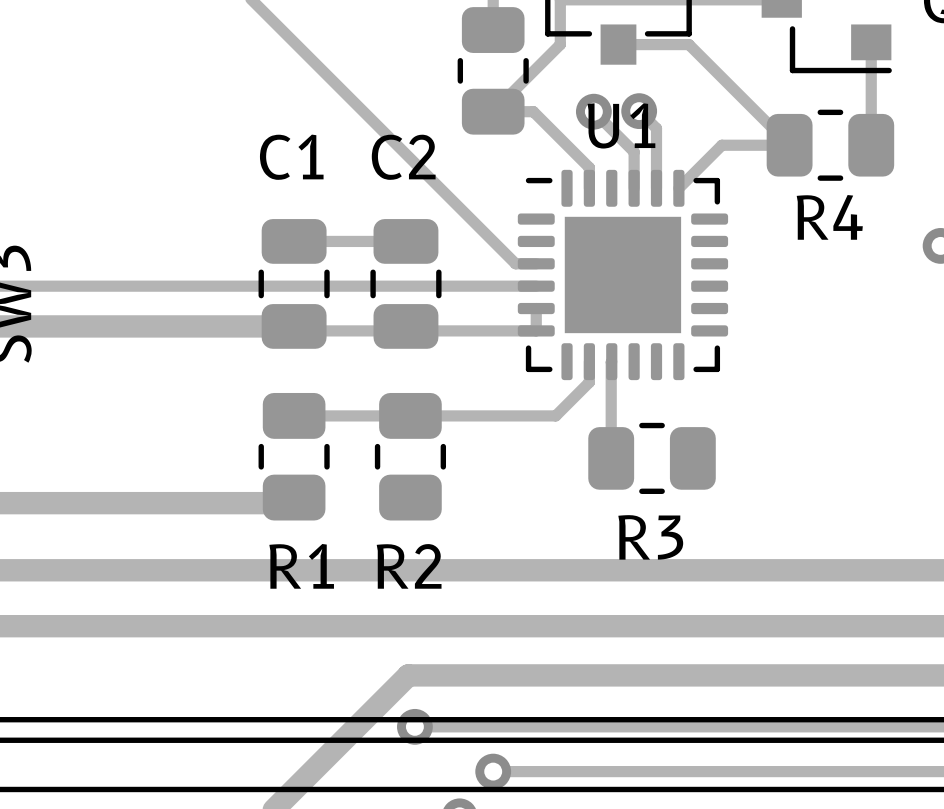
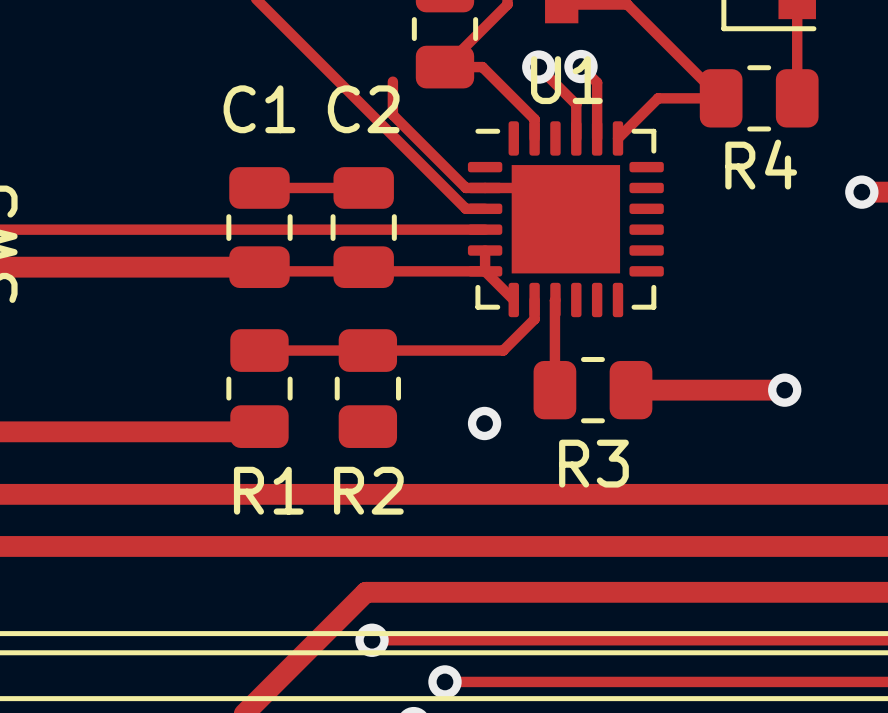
track: none -> (392, 81) (392, 114) (465, 187) (534, 187) (565, 219)
track: none -> (485, 271) (513, 300)
track: none -> (631, 390) (784, 390)
via: none -> (784, 390)
via: none -> (484, 423)

